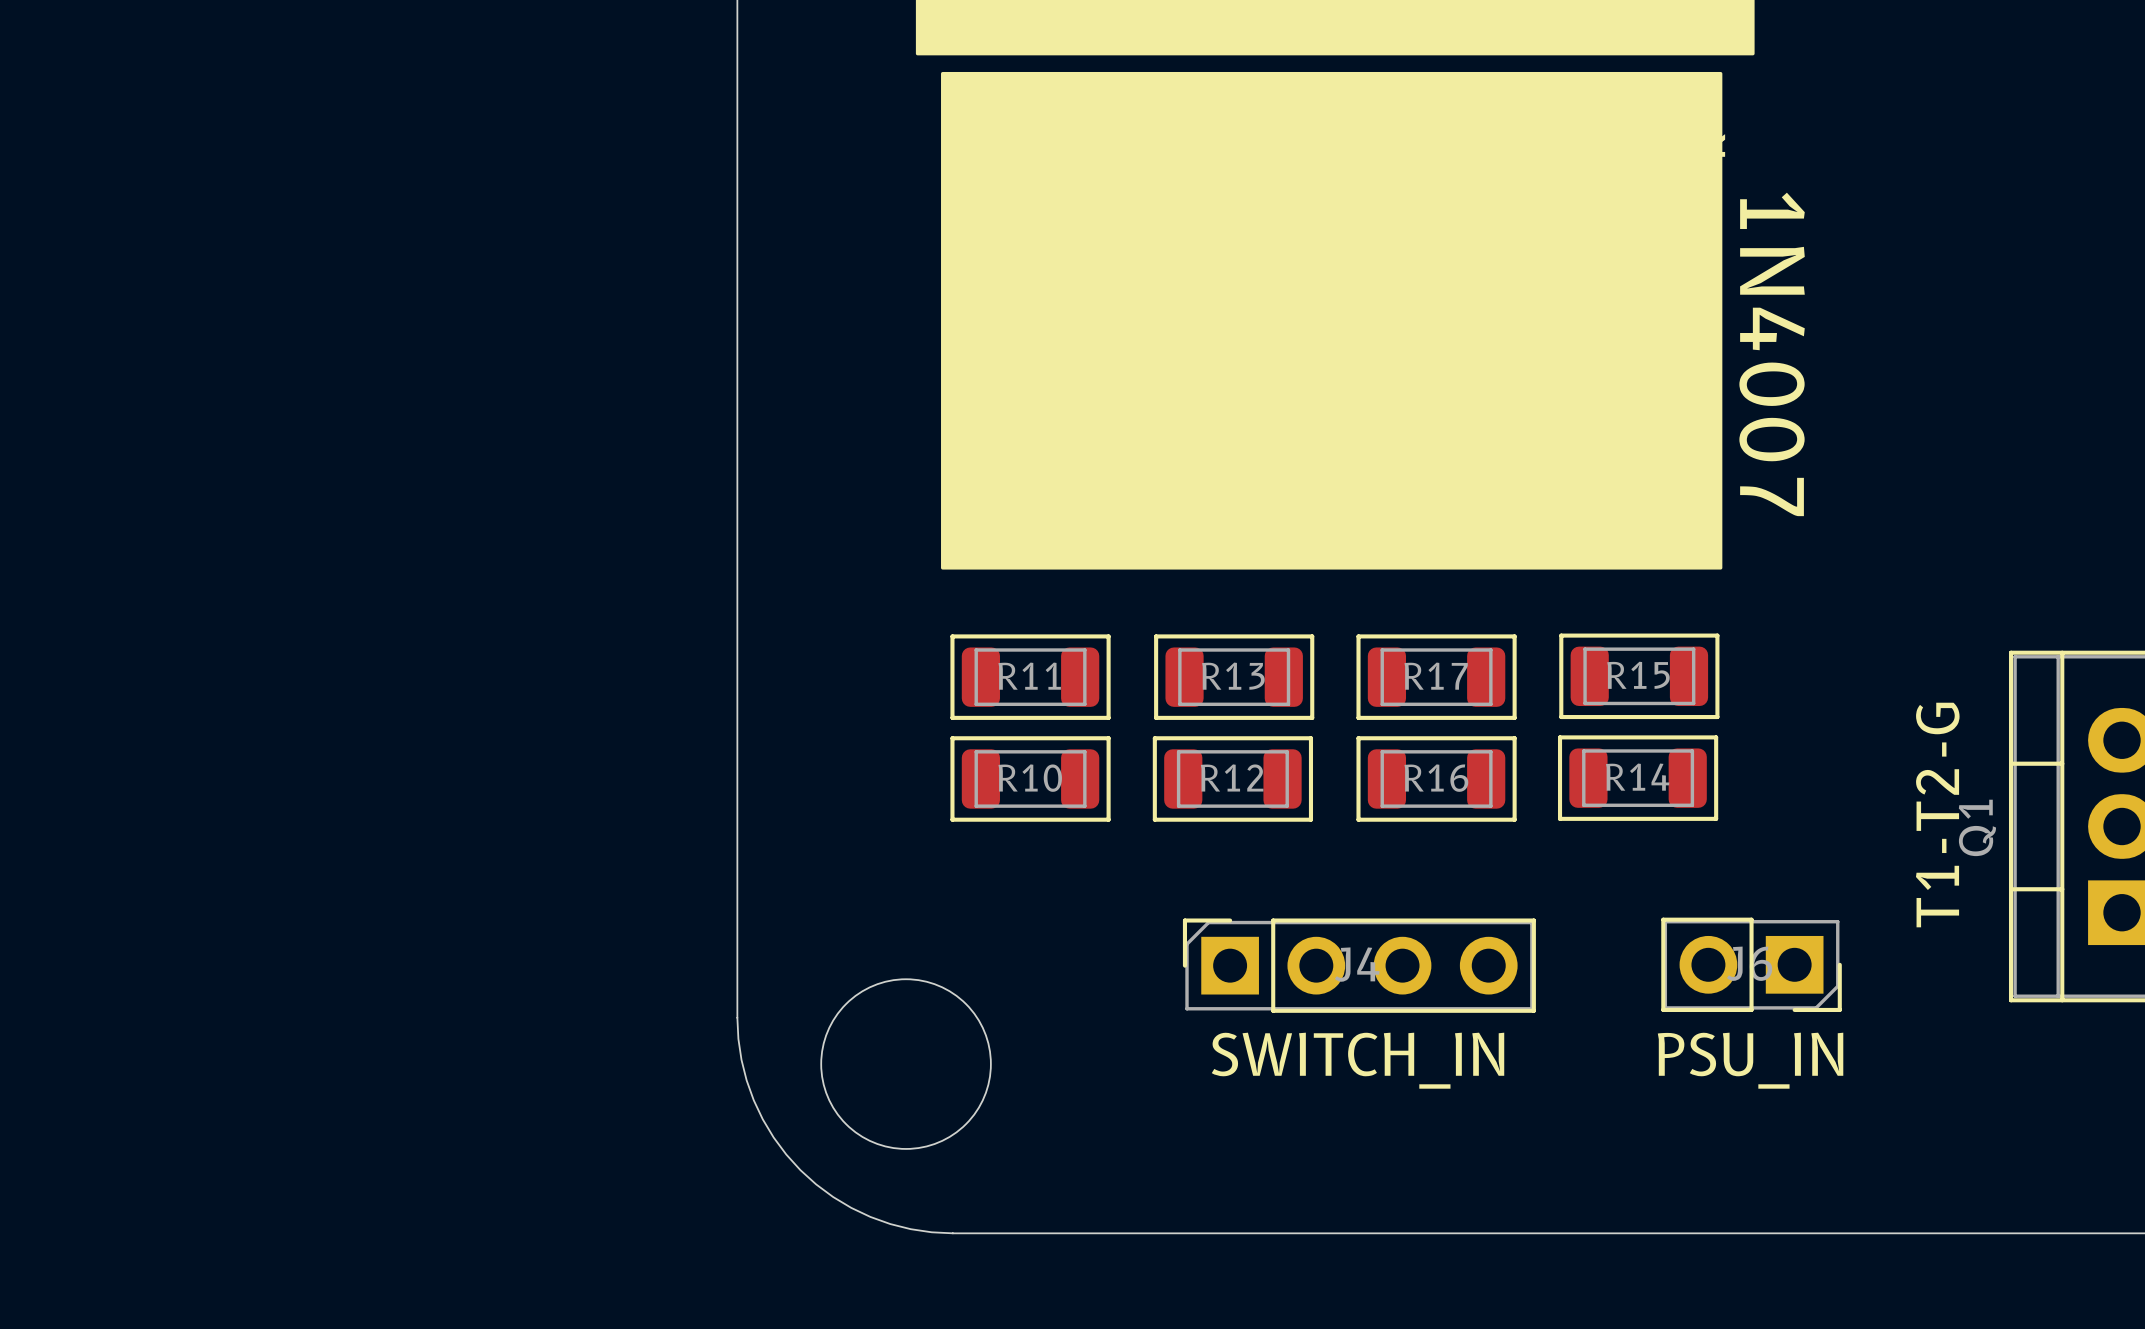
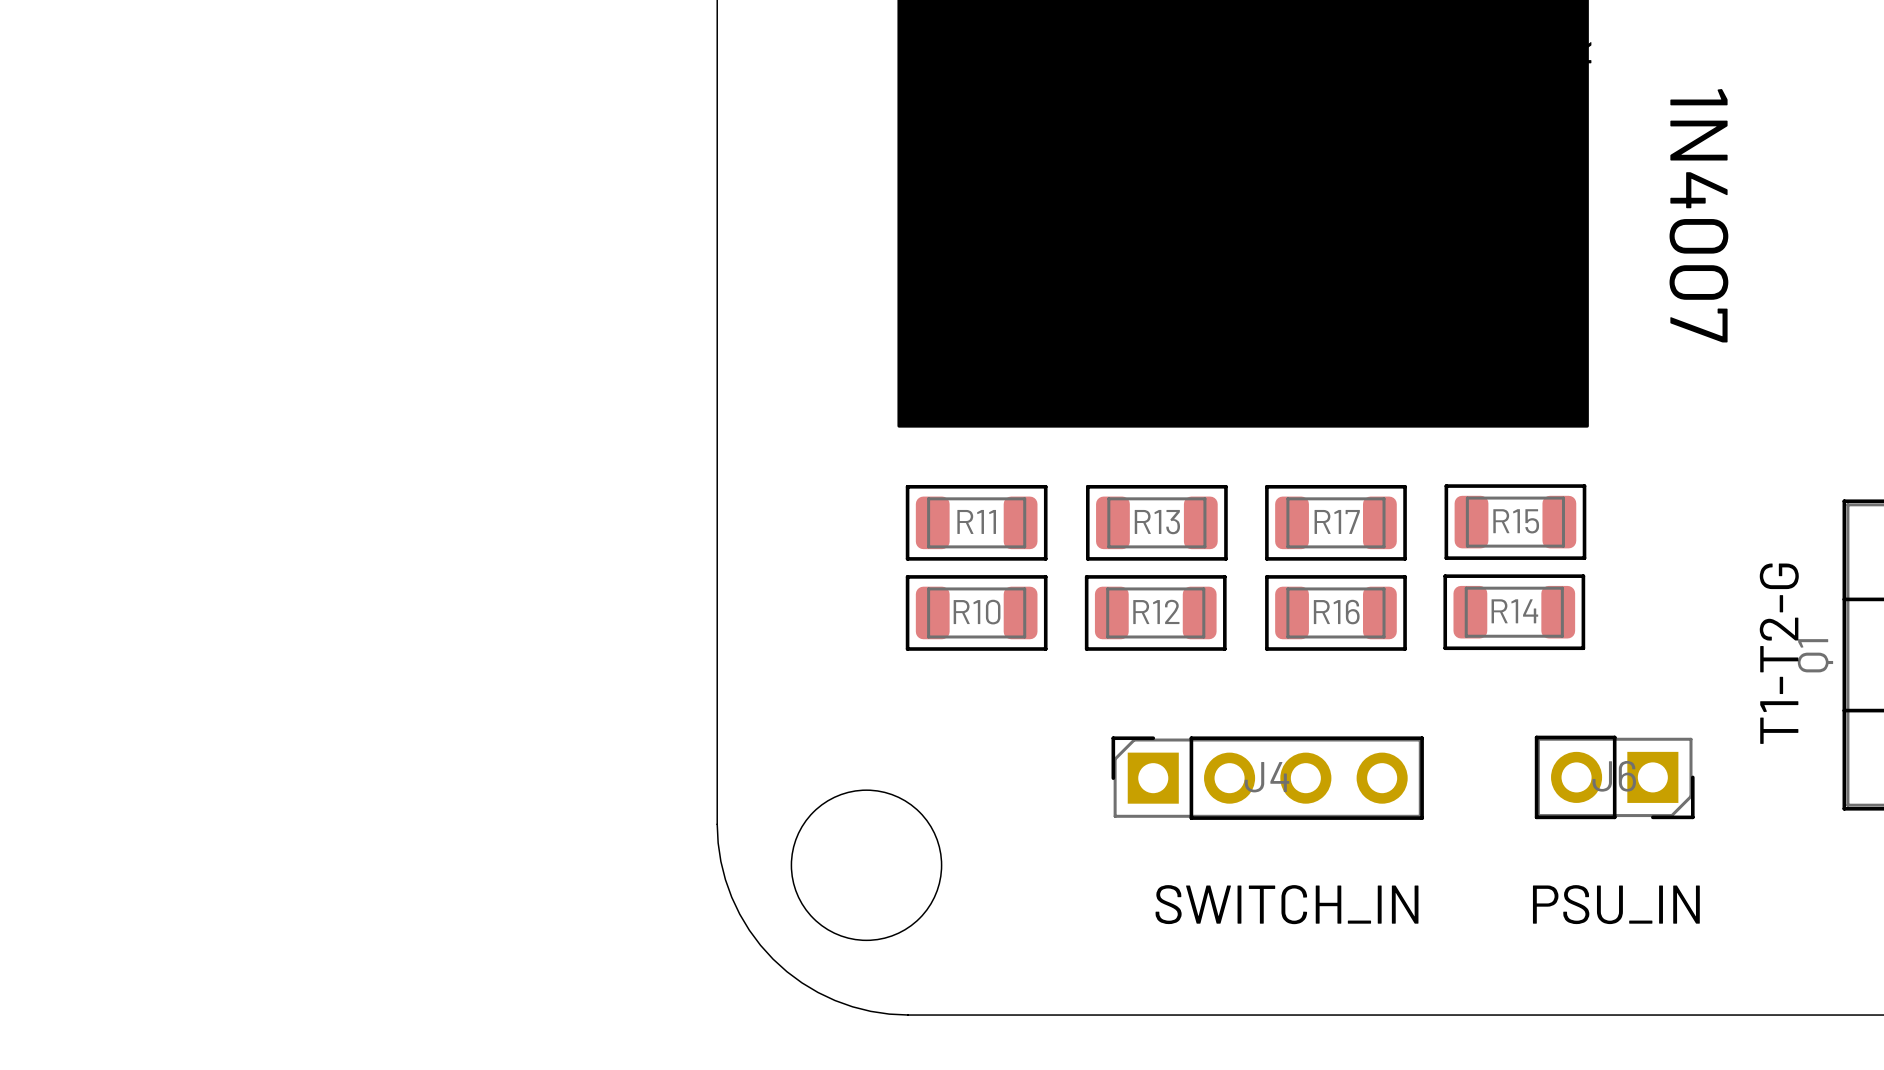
text position: 1N4007 (1772, 354) -> 1N4007 (1698, 215)
text position: SWITCH_IN (1357, 1060) -> SWITCH_IN (1287, 904)
text position: PSU_IN (1750, 1060) -> PSU_IN (1616, 904)

